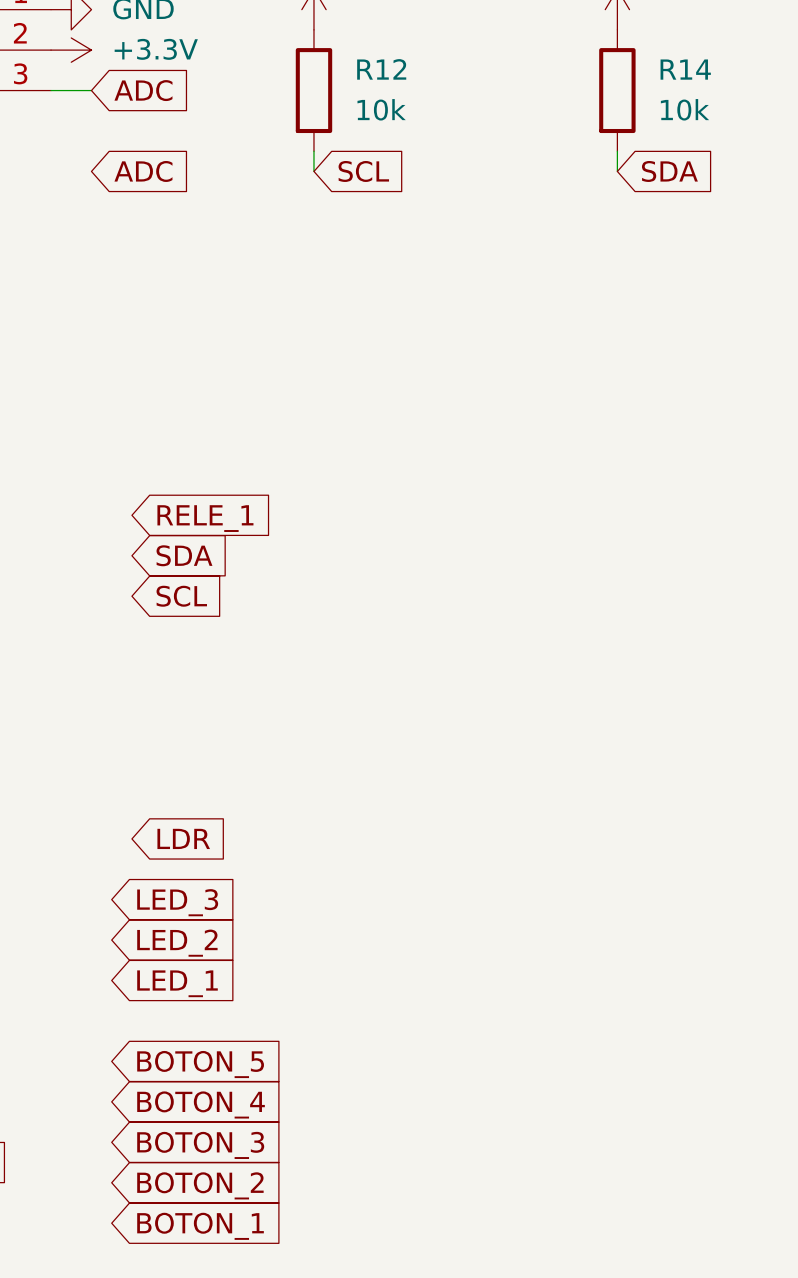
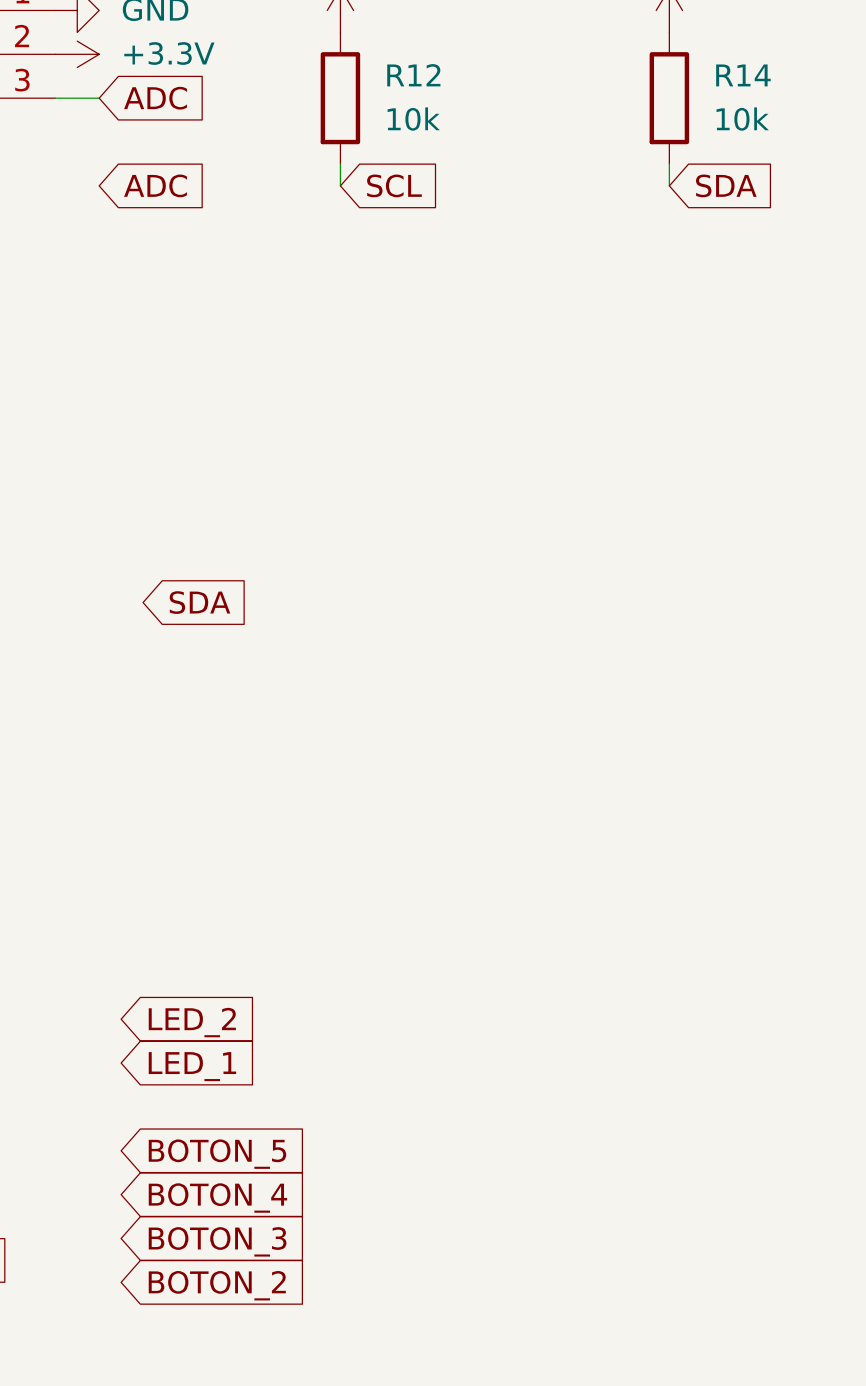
global label: RELE_1 (205, 518) -> none
global label: SCL (181, 596) -> none
global label: LDR (183, 838) -> none
global label: LED_3 (177, 902) -> none
global label: BOTON_1 (200, 1226) -> none

